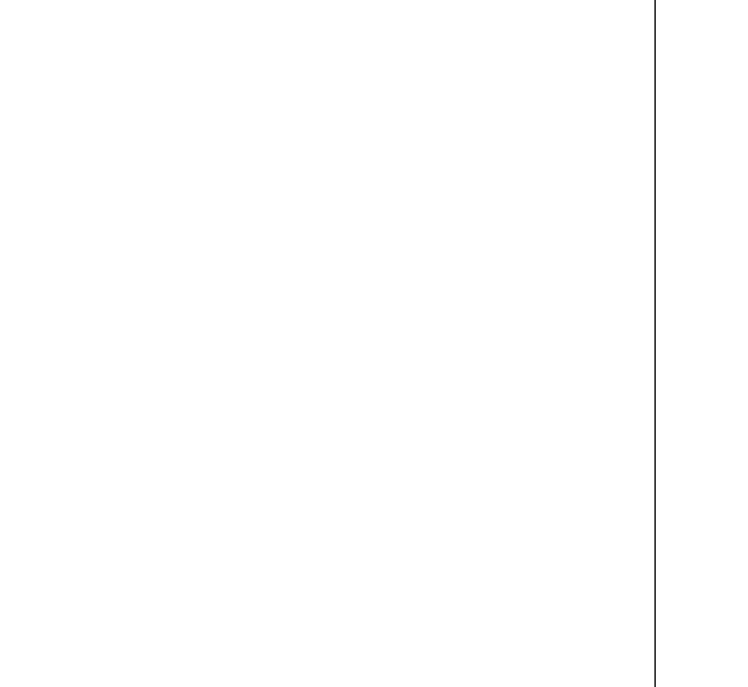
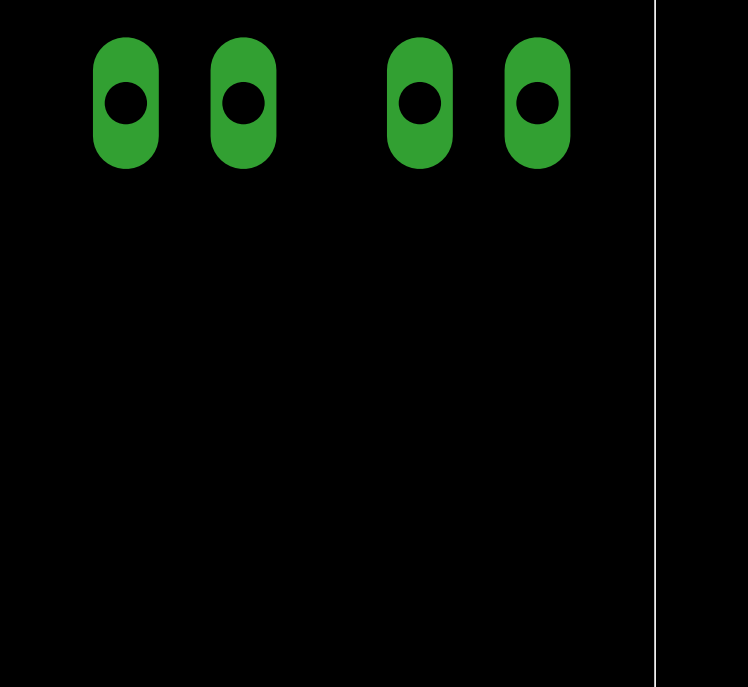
part: none -> (184, 103)
part: none -> (478, 103)

